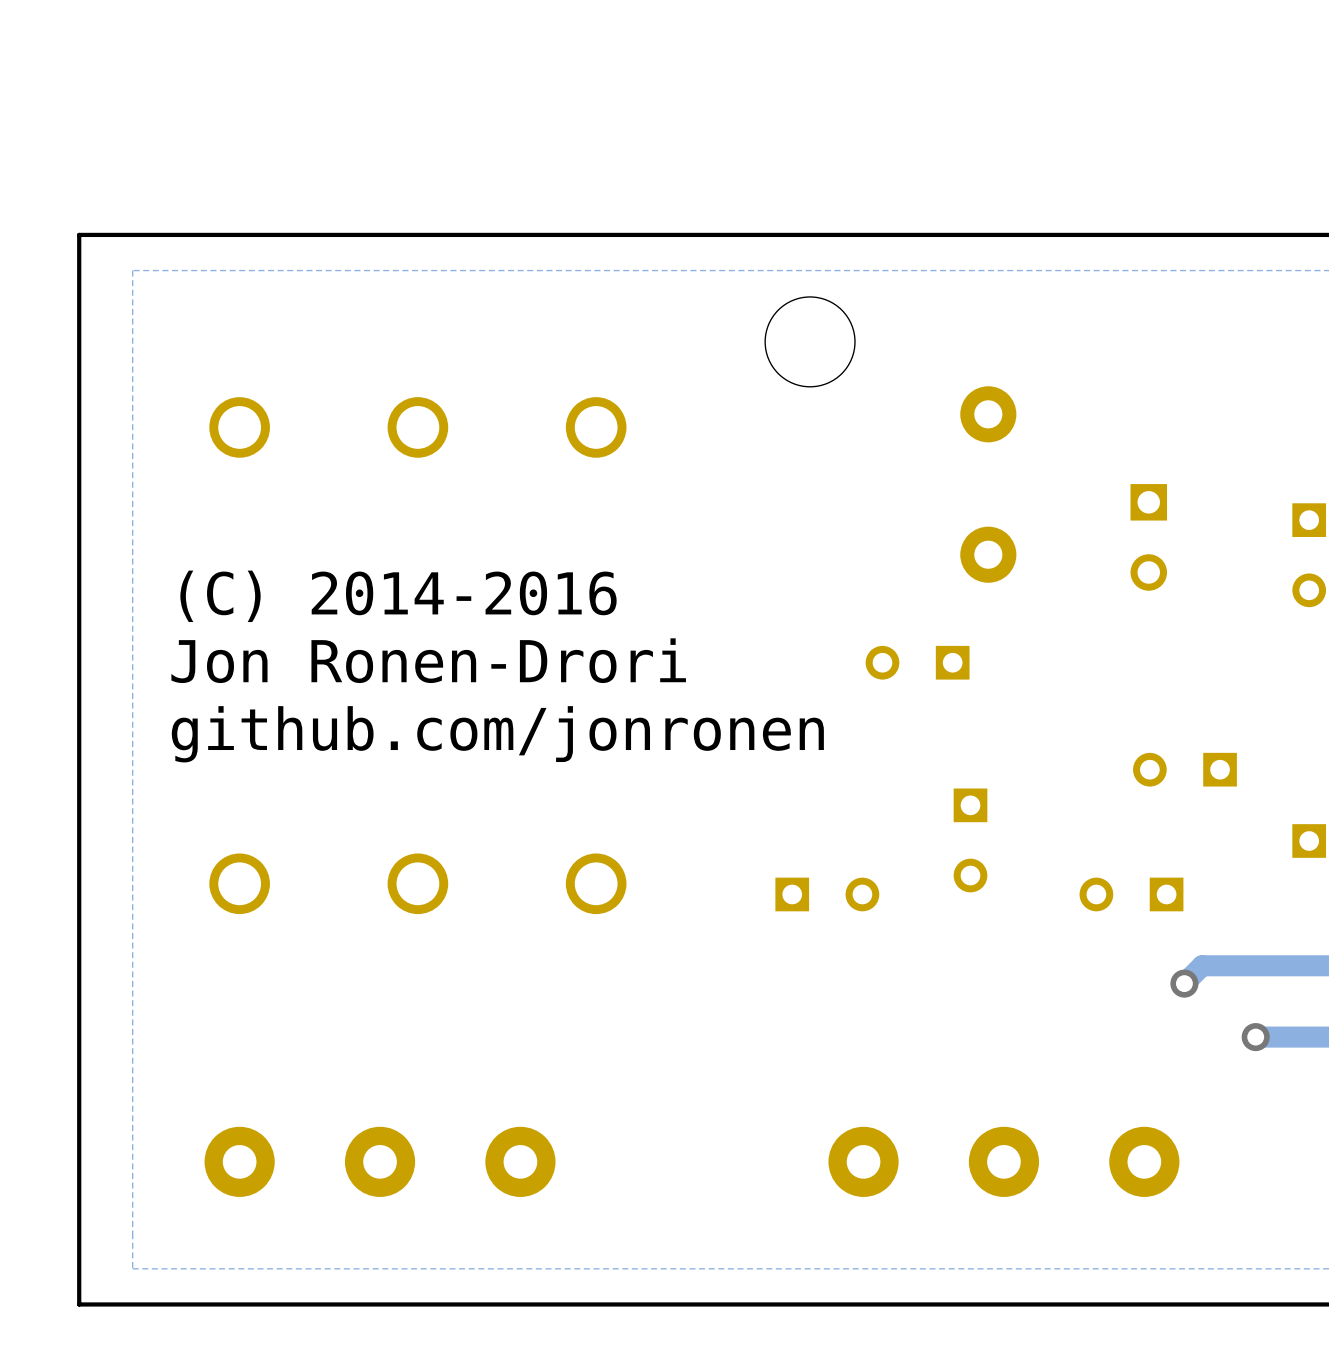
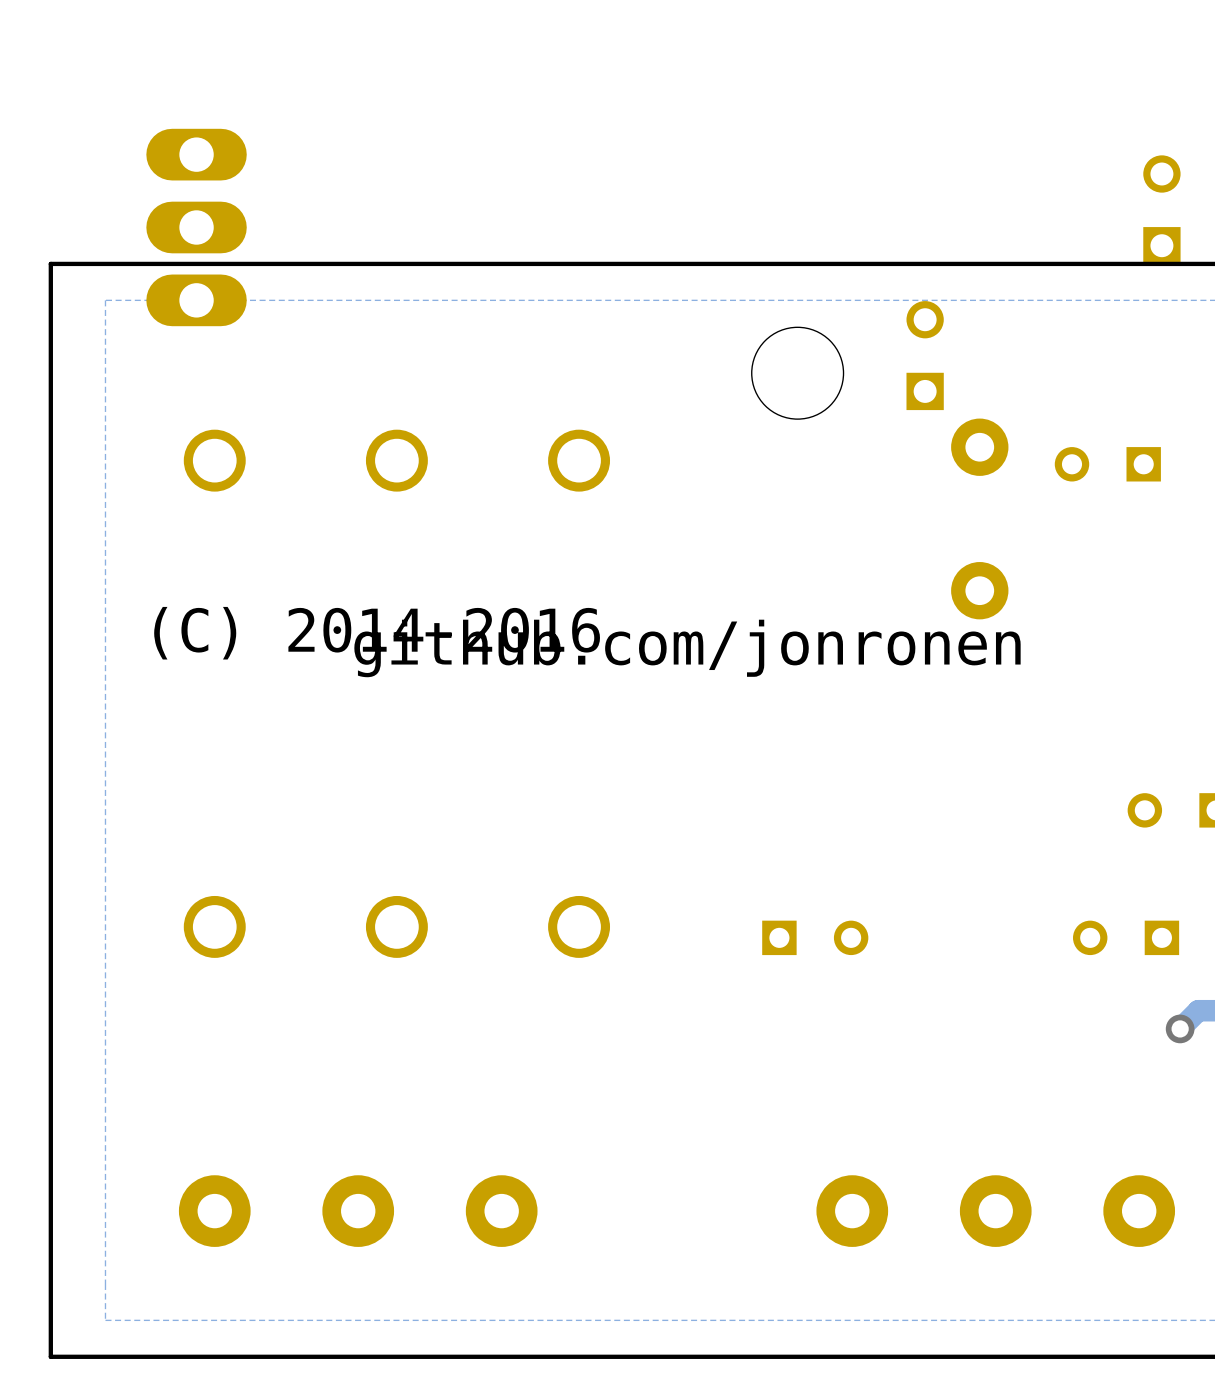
part: none -> (1161, 209)
part: none -> (196, 227)
part: none -> (925, 355)
part: none -> (1107, 464)
part: (1148, 537) -> none
text: Jon Ronen-Drori (428, 660) -> none
part: (917, 662) -> none
text position: github.com/jonronen (497, 734) -> github.com/jonronen (687, 648)
part: (970, 840) -> none

